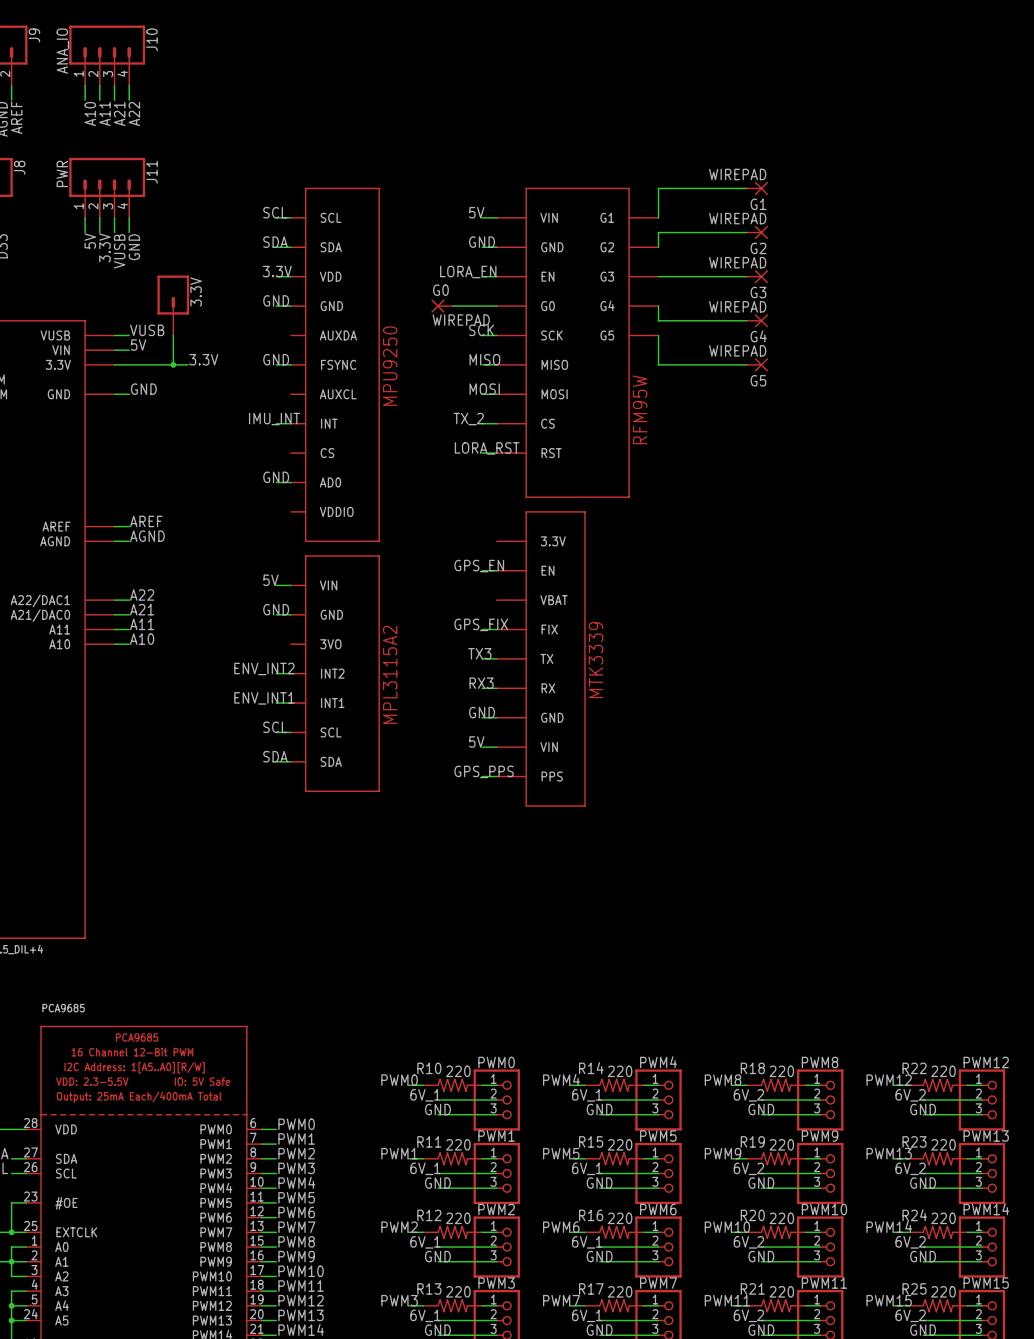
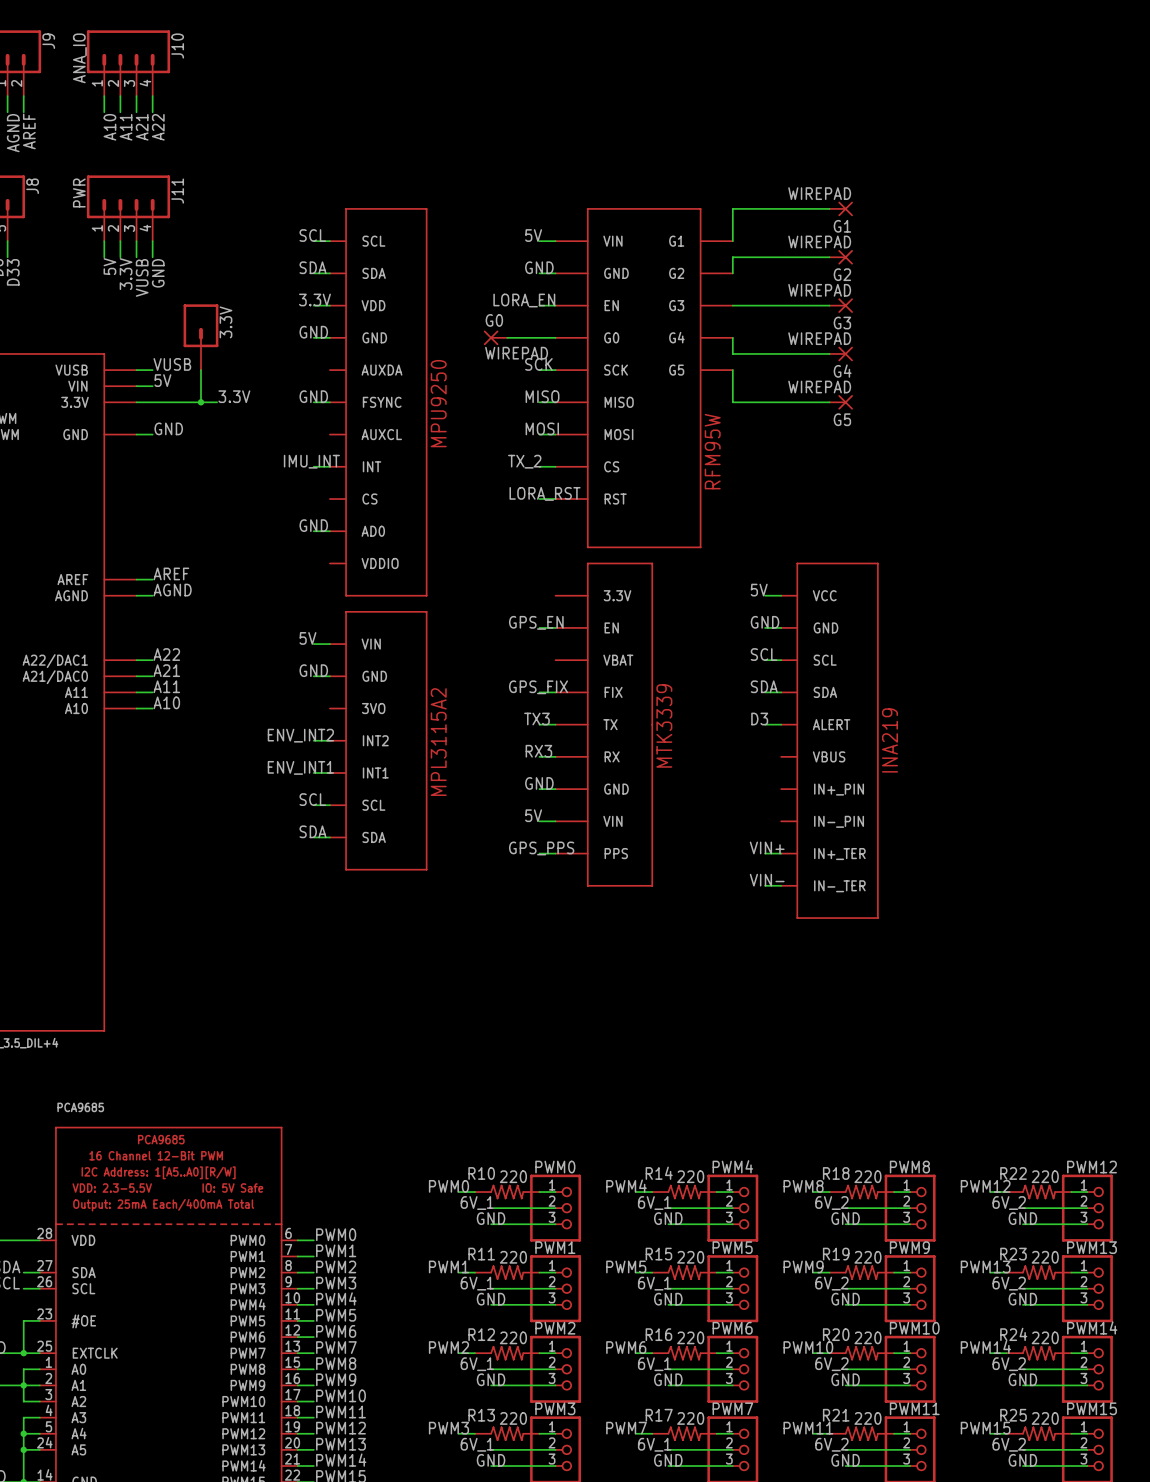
label: none -> 5V (759, 590)
wire: none -> (765, 595) (781, 595)
label: none -> GND (765, 622)
wire: none -> (765, 627) (781, 627)
label: none -> SCL (764, 654)
wire: none -> (765, 660) (781, 660)
label: none -> SDA (764, 686)
wire: none -> (765, 692) (781, 692)
label: none -> D3 (759, 719)
wire: none -> (765, 724) (781, 724)
part: none -> (829, 740)
label: none -> VIN+ (767, 847)
wire: none -> (765, 853) (781, 853)
label: none -> VIN- (767, 880)
wire: none -> (765, 885) (781, 885)

